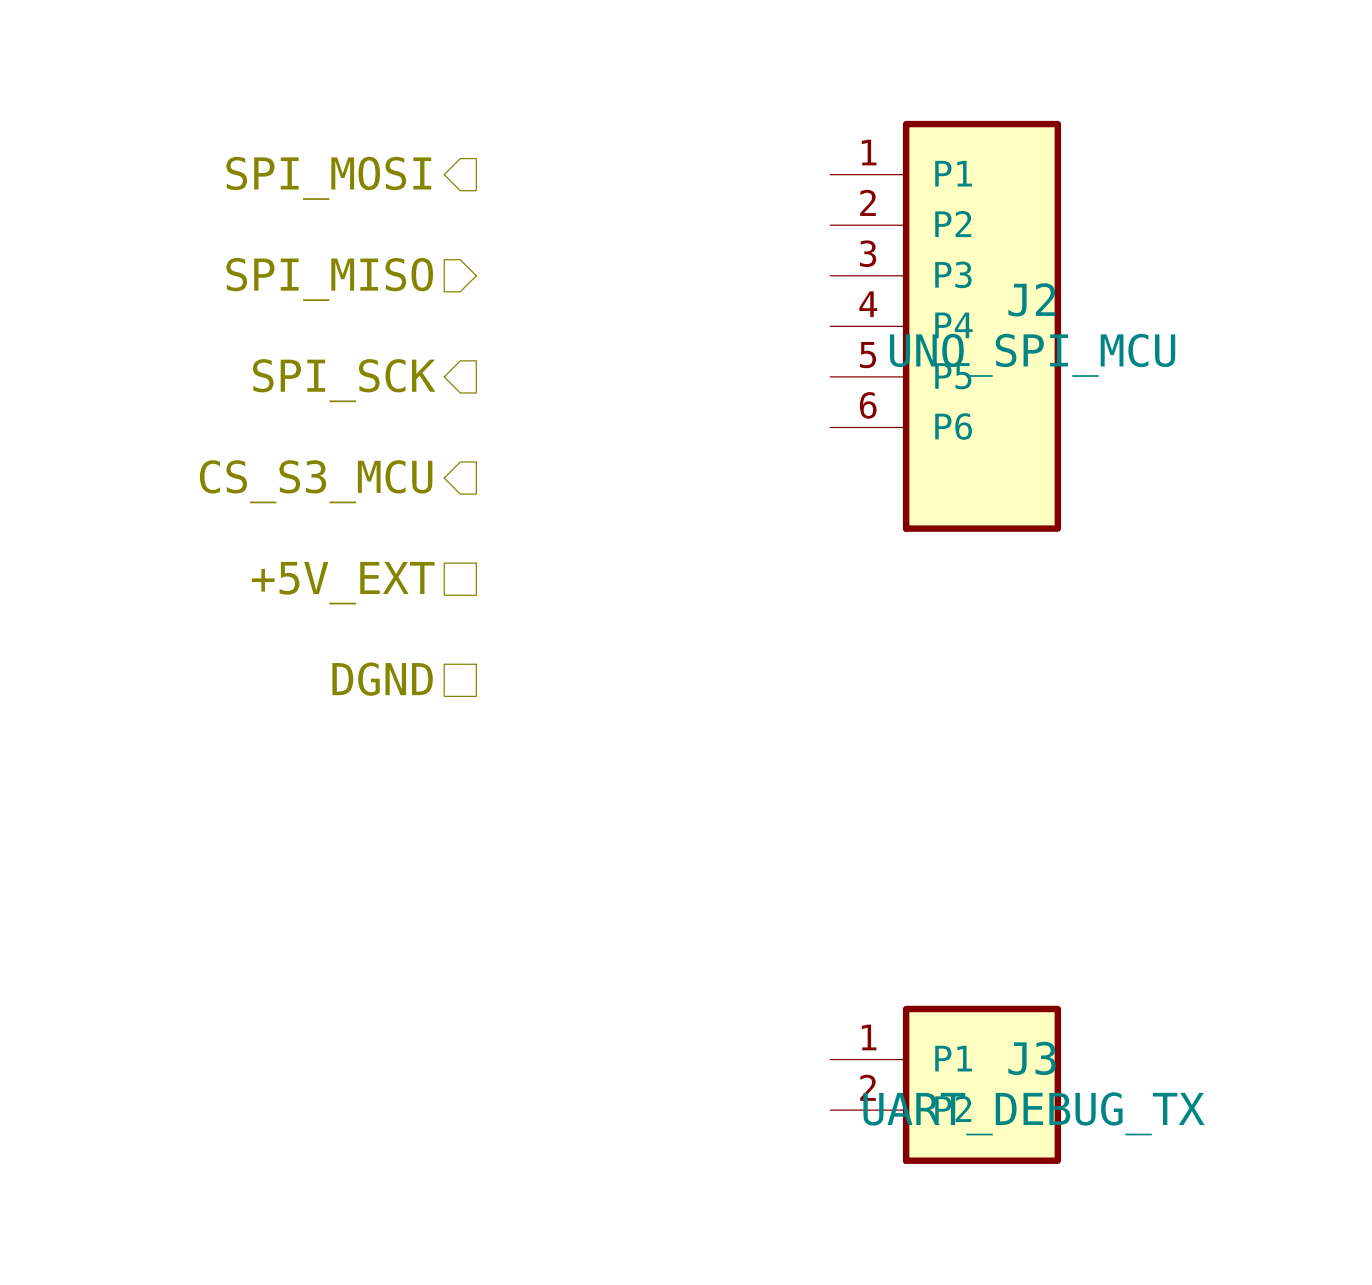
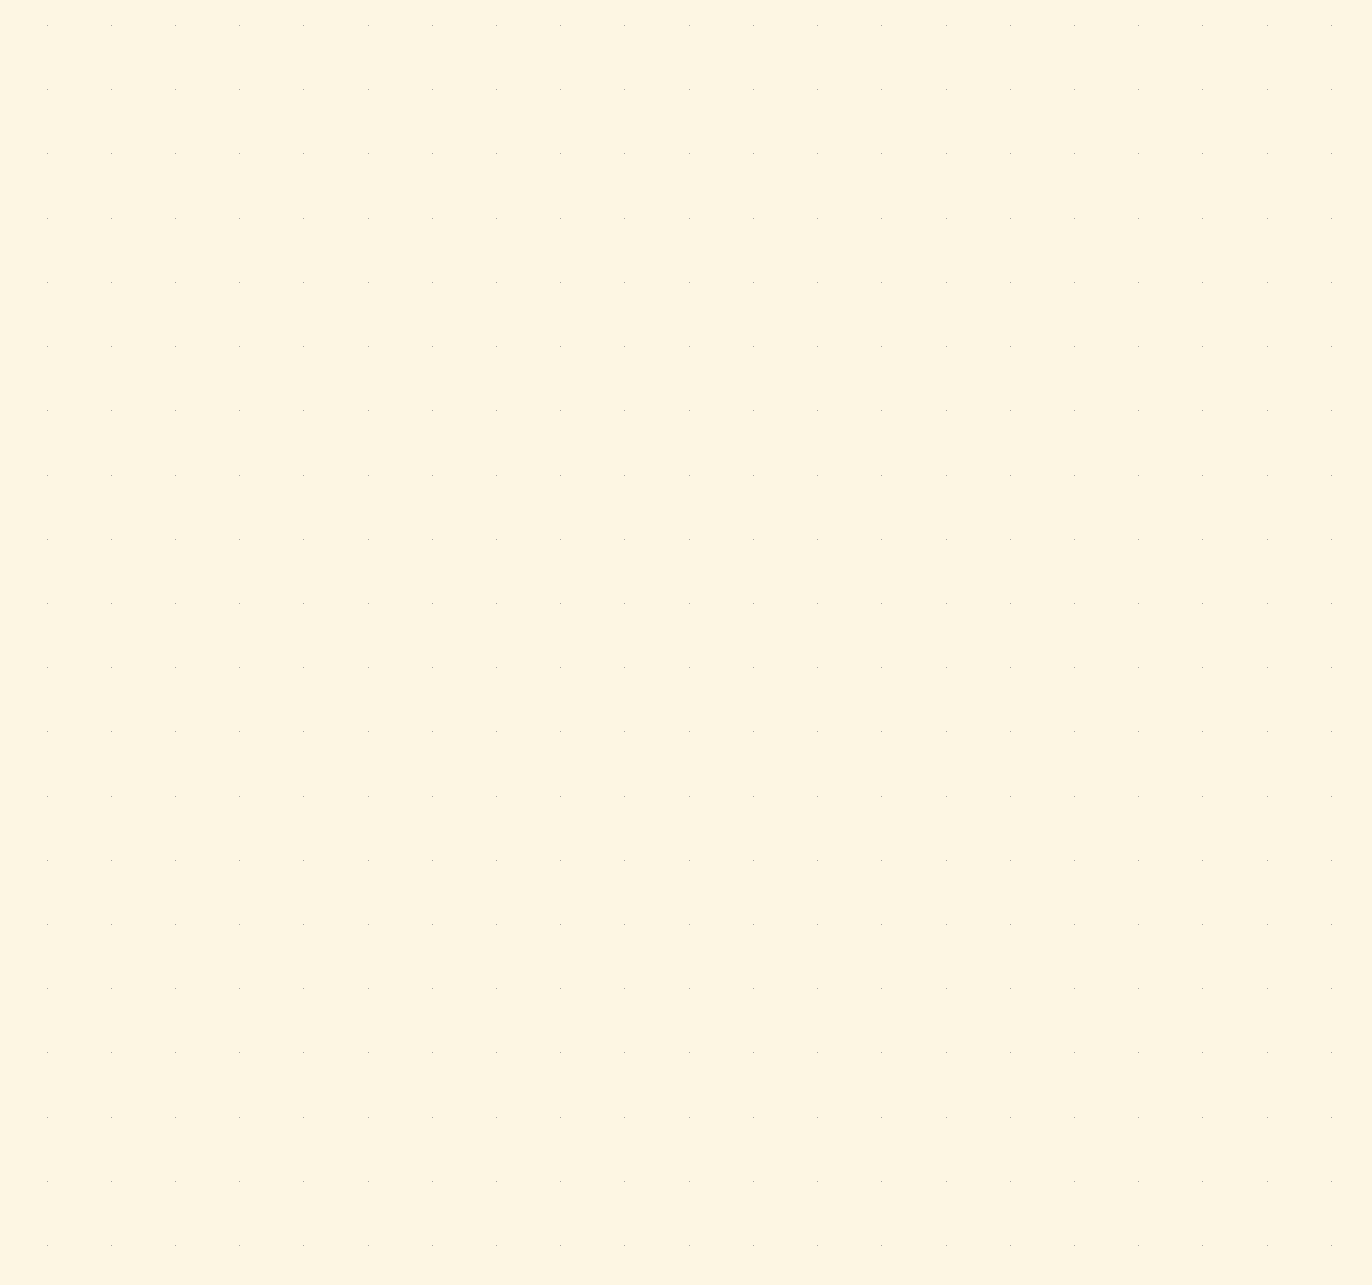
hierarchical label: SPI_MOSI (328, 178) -> none
hierarchical label: SPI_MISO (329, 279) -> none
J2: UNO_SPI_MCU (945, 326) -> none
hierarchical label: SPI_SCK (344, 380) -> none
hierarchical label: CS_S3_MCU (316, 481) -> none
hierarchical label: +5V_EXT (343, 583) -> none
hierarchical label: DGND (382, 679) -> none
J3: UART_DEBUG_TX (945, 1084) -> none

